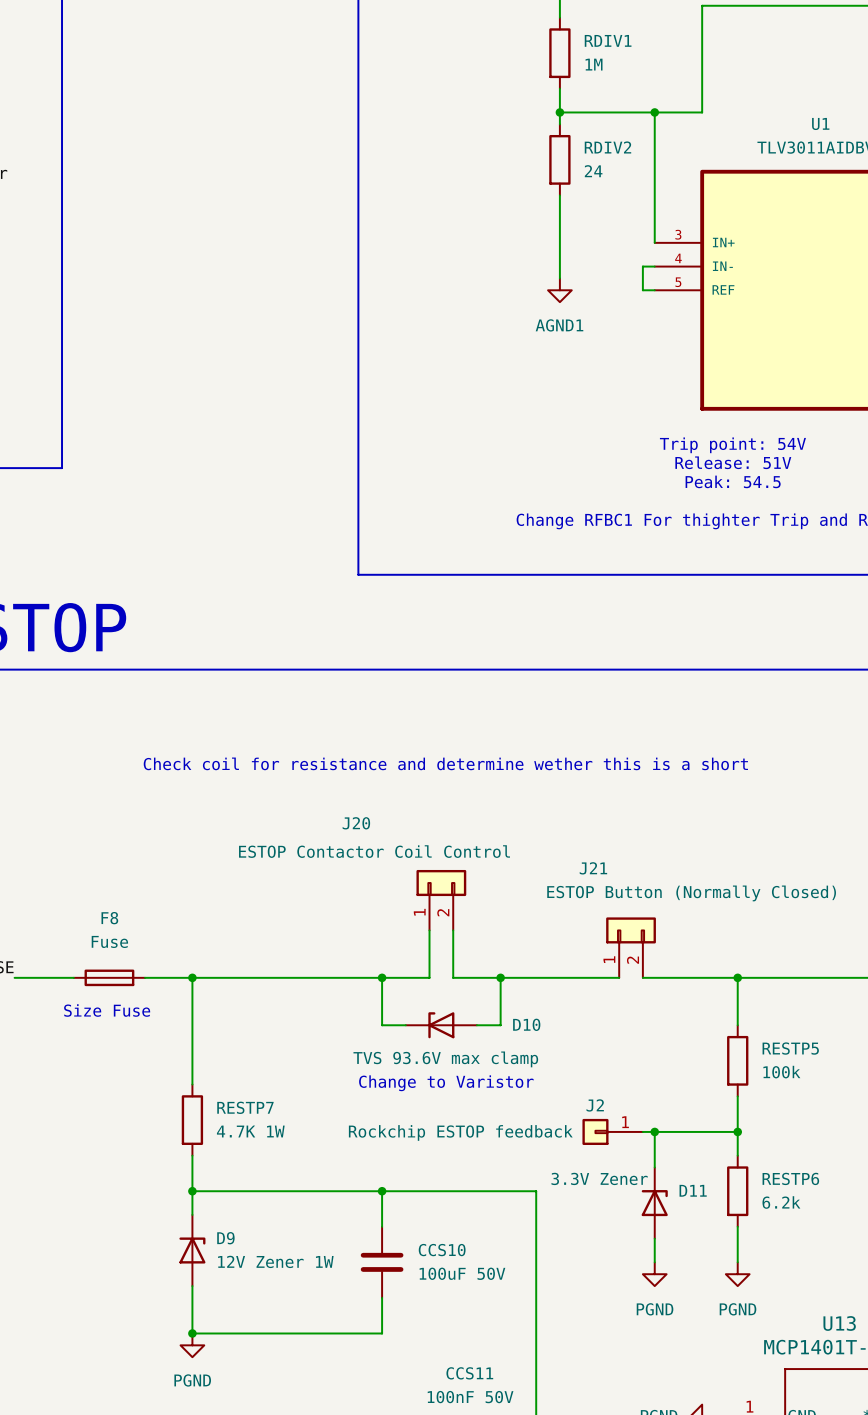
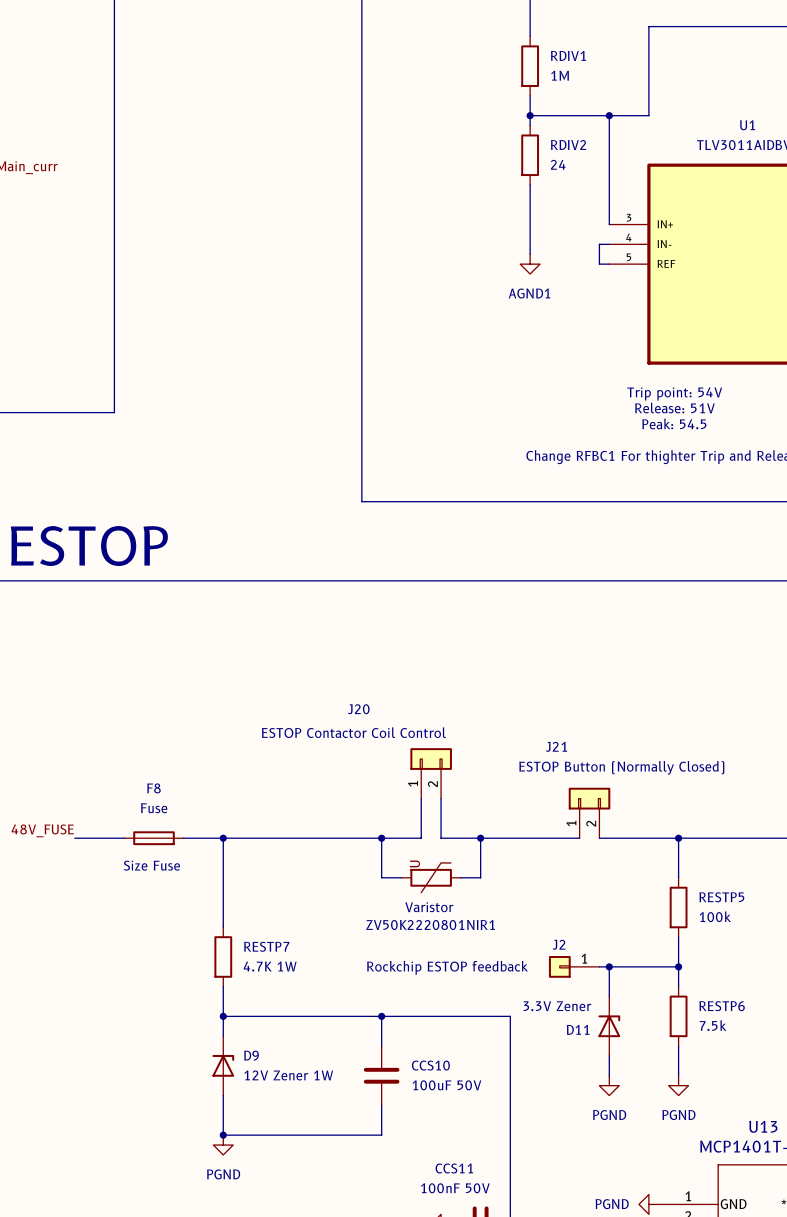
text: Check coil for resistance and determine wether this is a short (445, 763) -> none
D10: TVS 93.6V max clamp (441, 1025) -> none
ZV50K2220801NIR1: none -> Varistor (431, 877)
text: Change to Varistor (446, 1083) -> none
D11 name position: D11 (693, 1190) -> D11 (578, 1029)
RESTP6 value: 6.2k (781, 1202) -> 7.5k (713, 1025)

